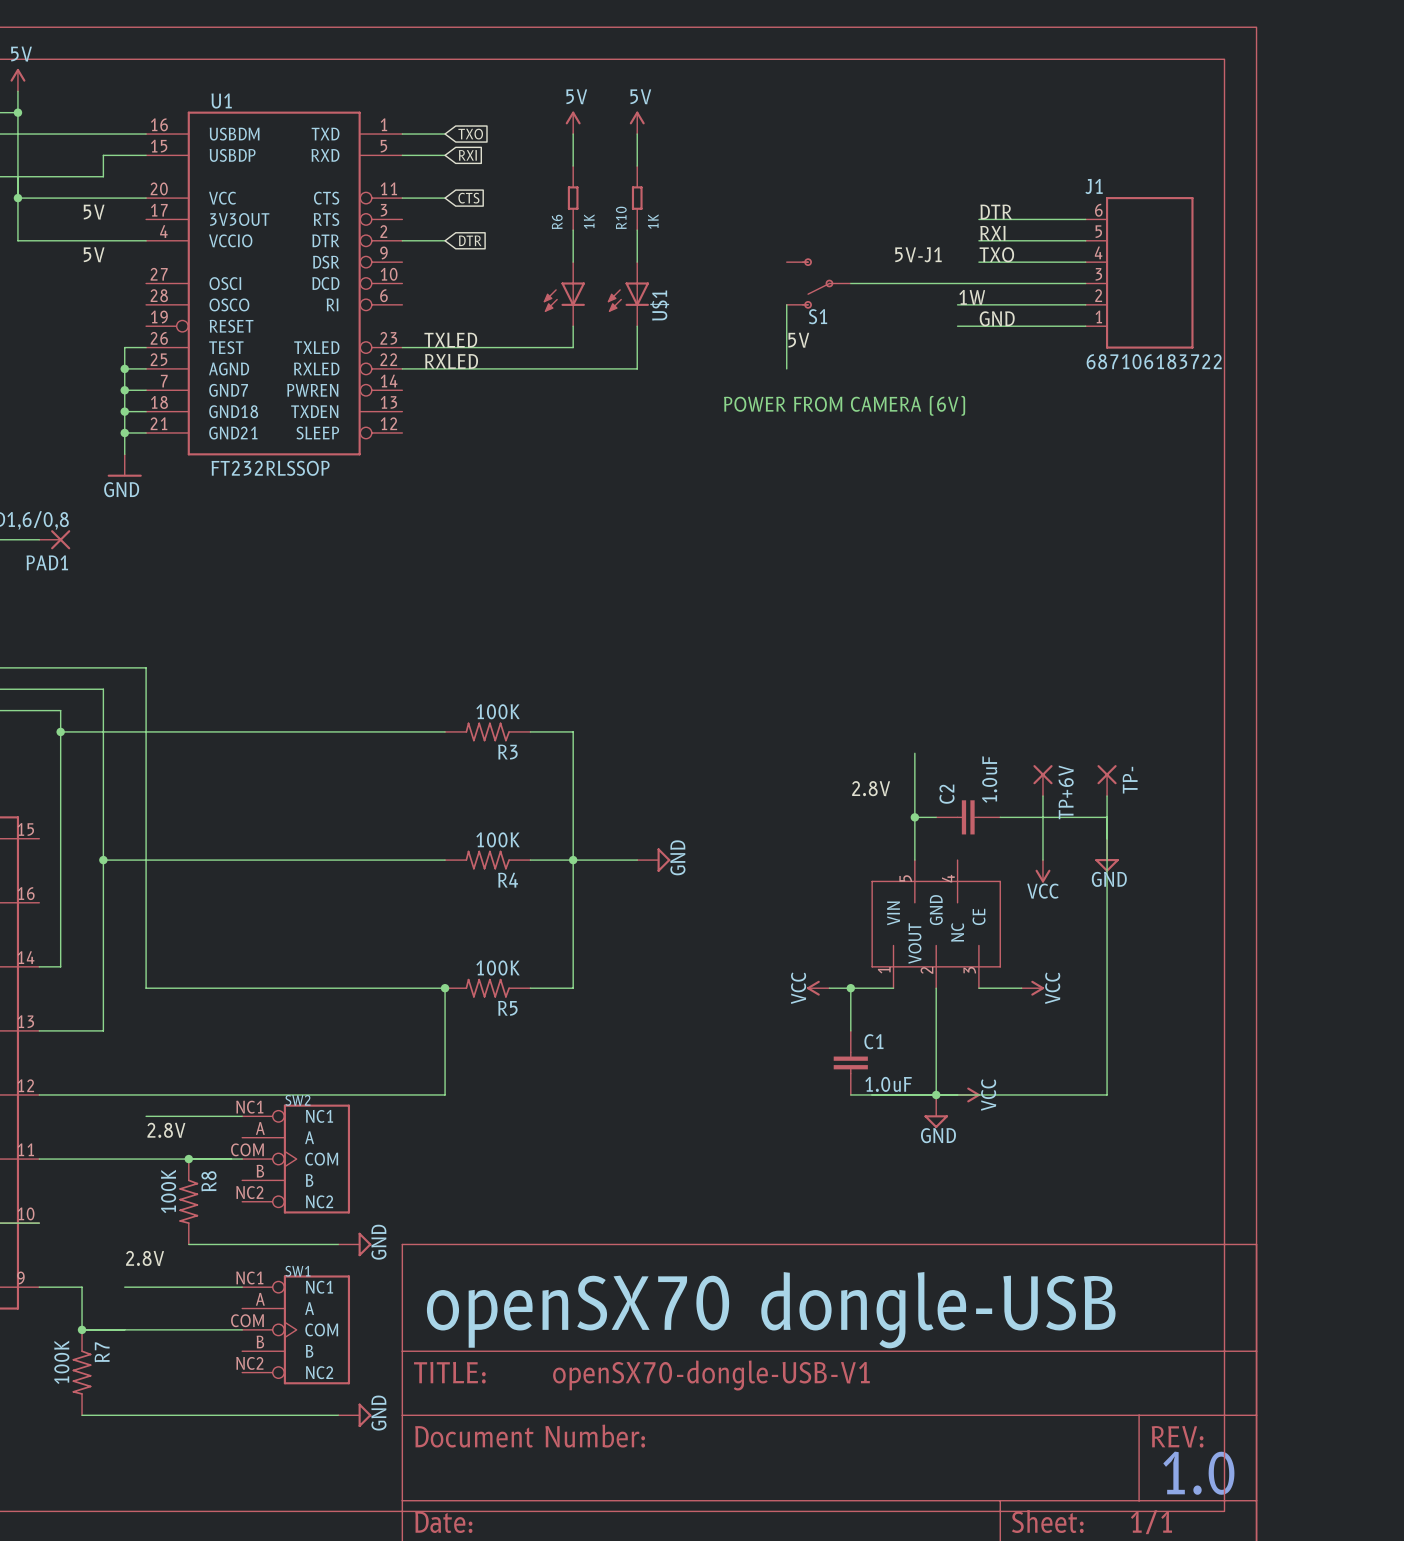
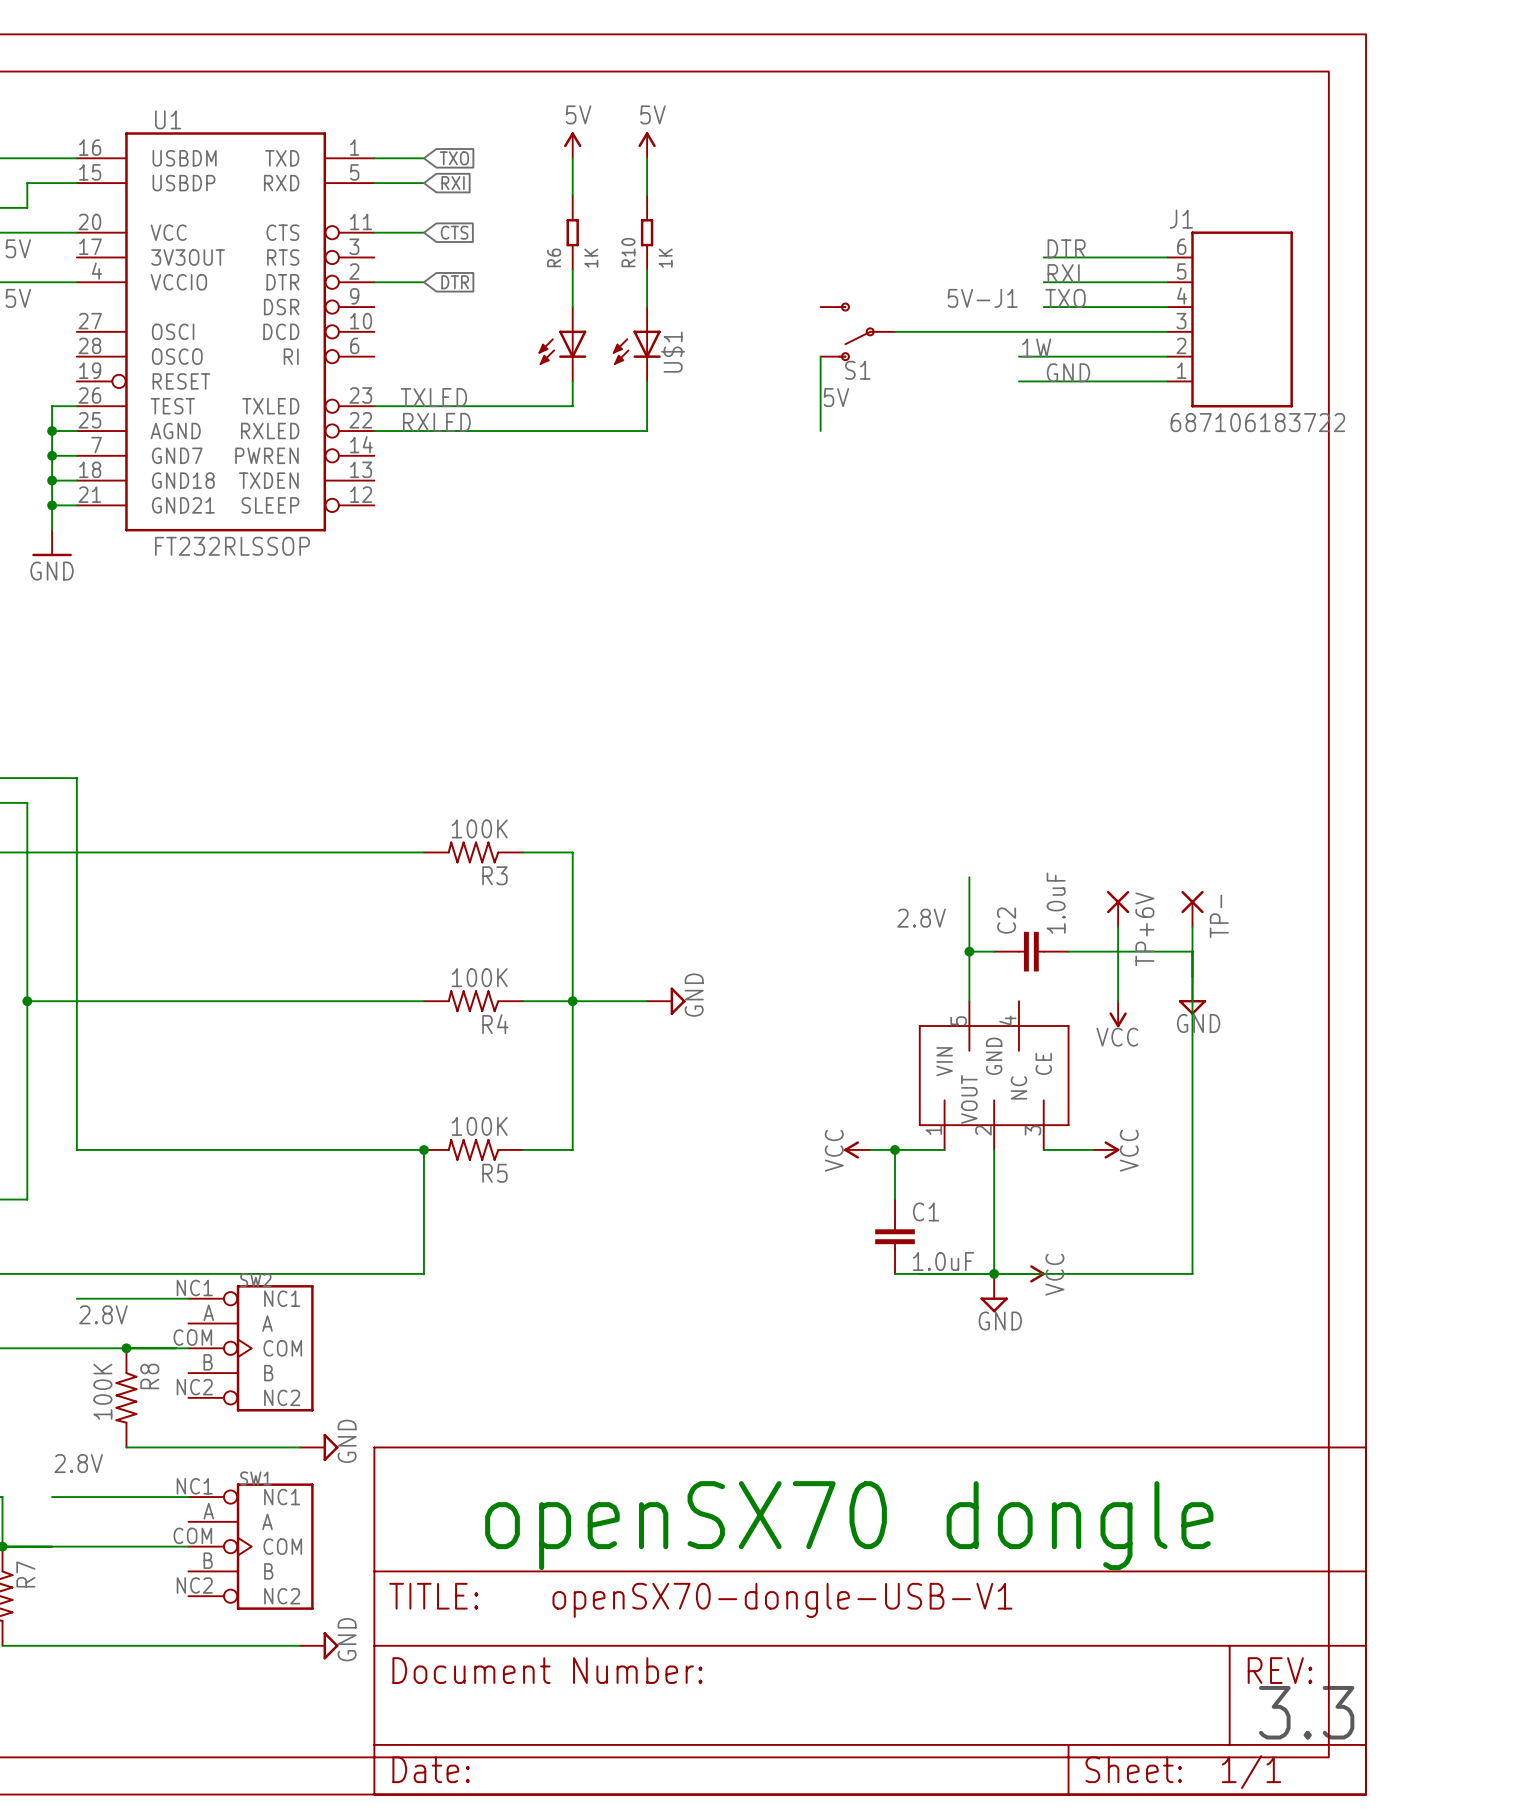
text: POWER FROM CAMERA (6V) (844, 405) -> none
text: openSX70 dongle-USB (771, 1310) -> openSX70 dongle (849, 1525)
text: 1.0 (1198, 1473) -> 3.3 (1306, 1712)

